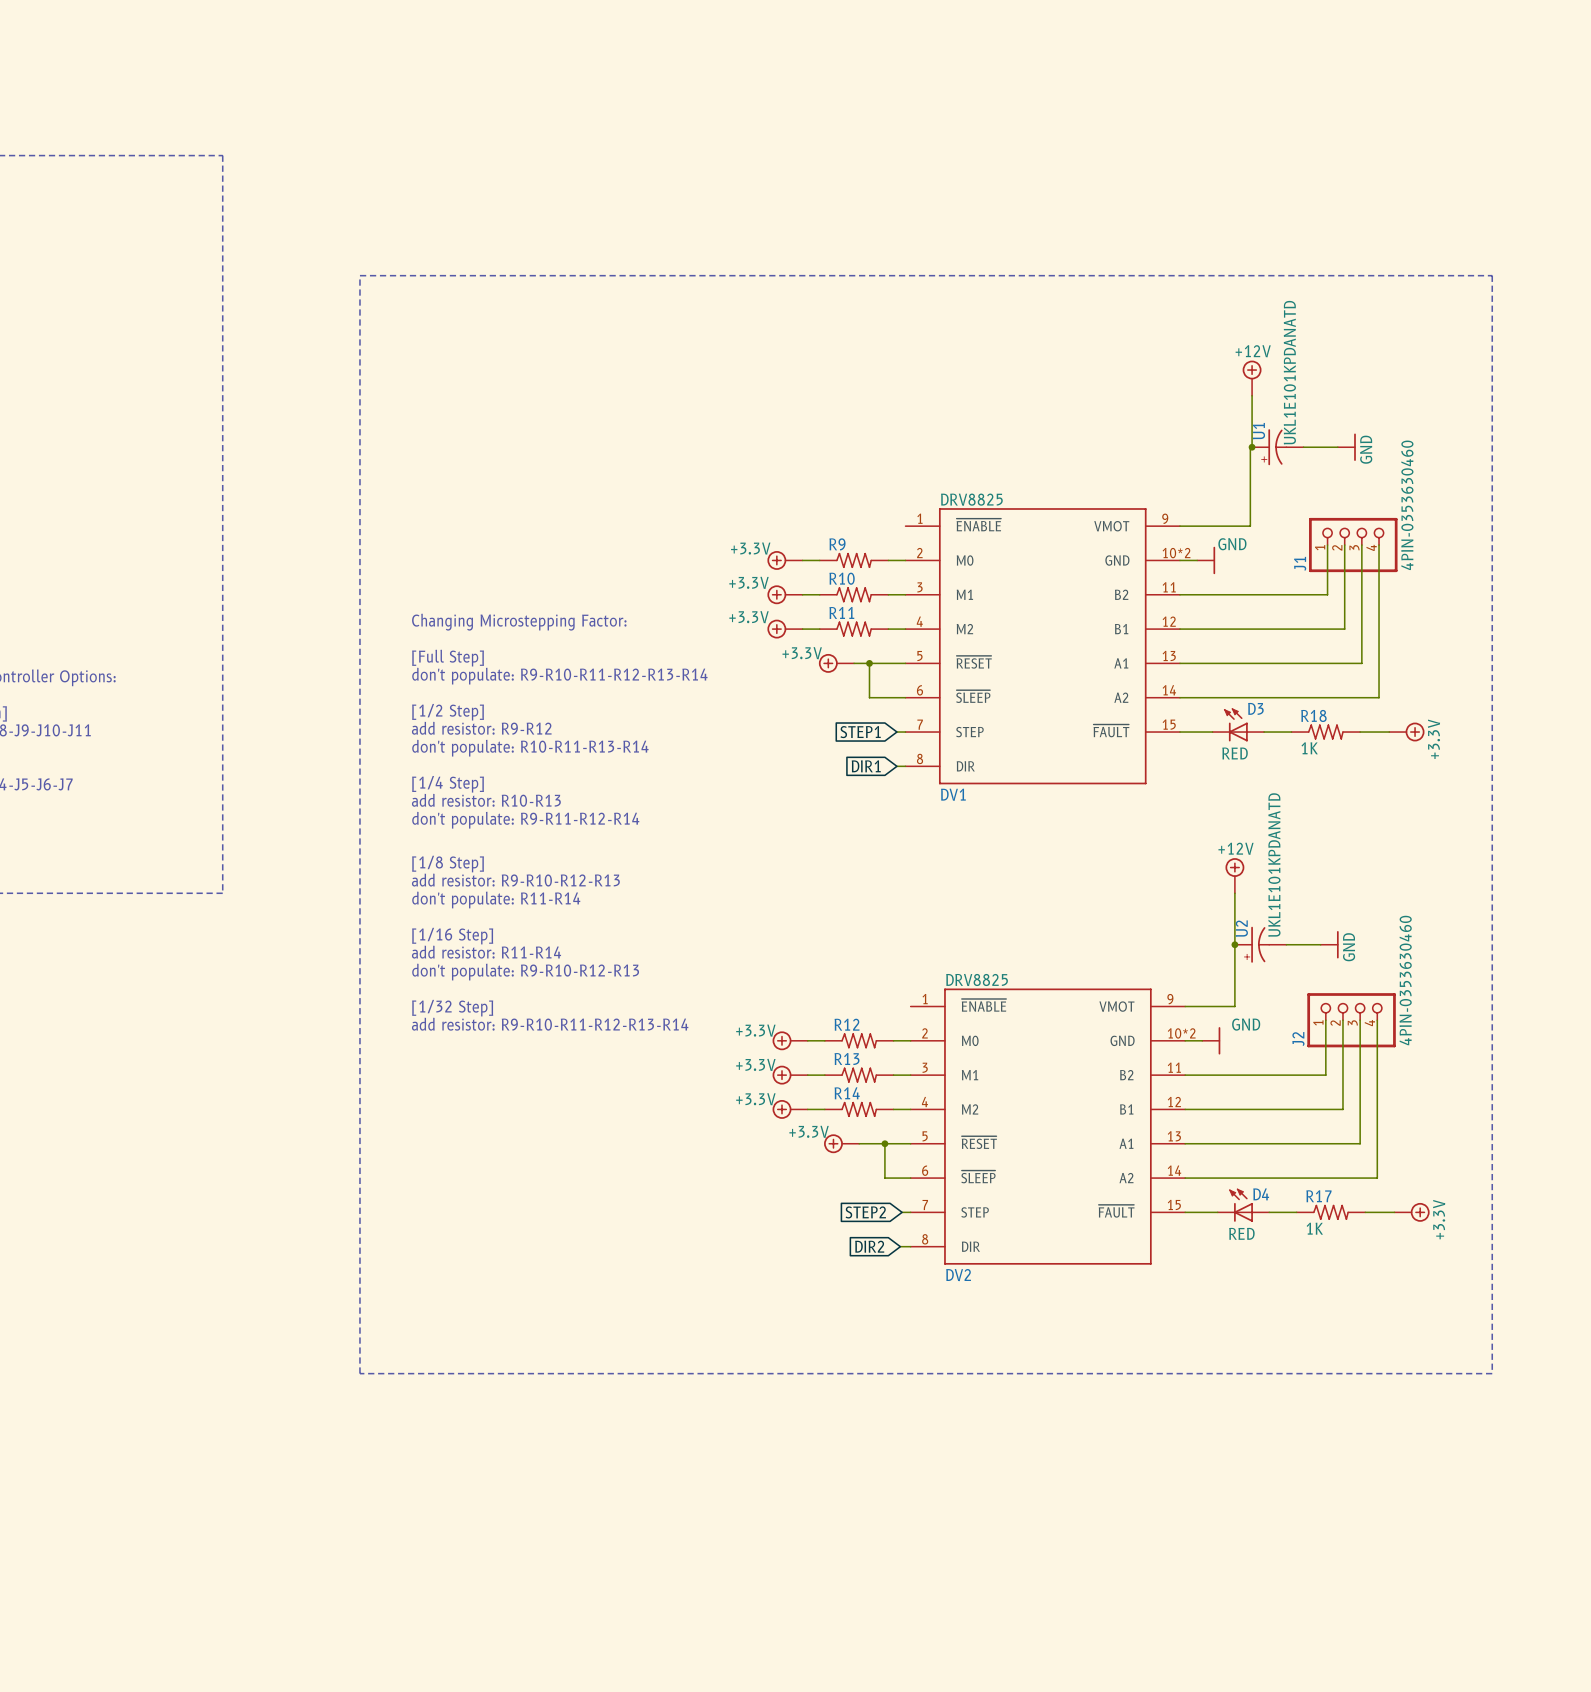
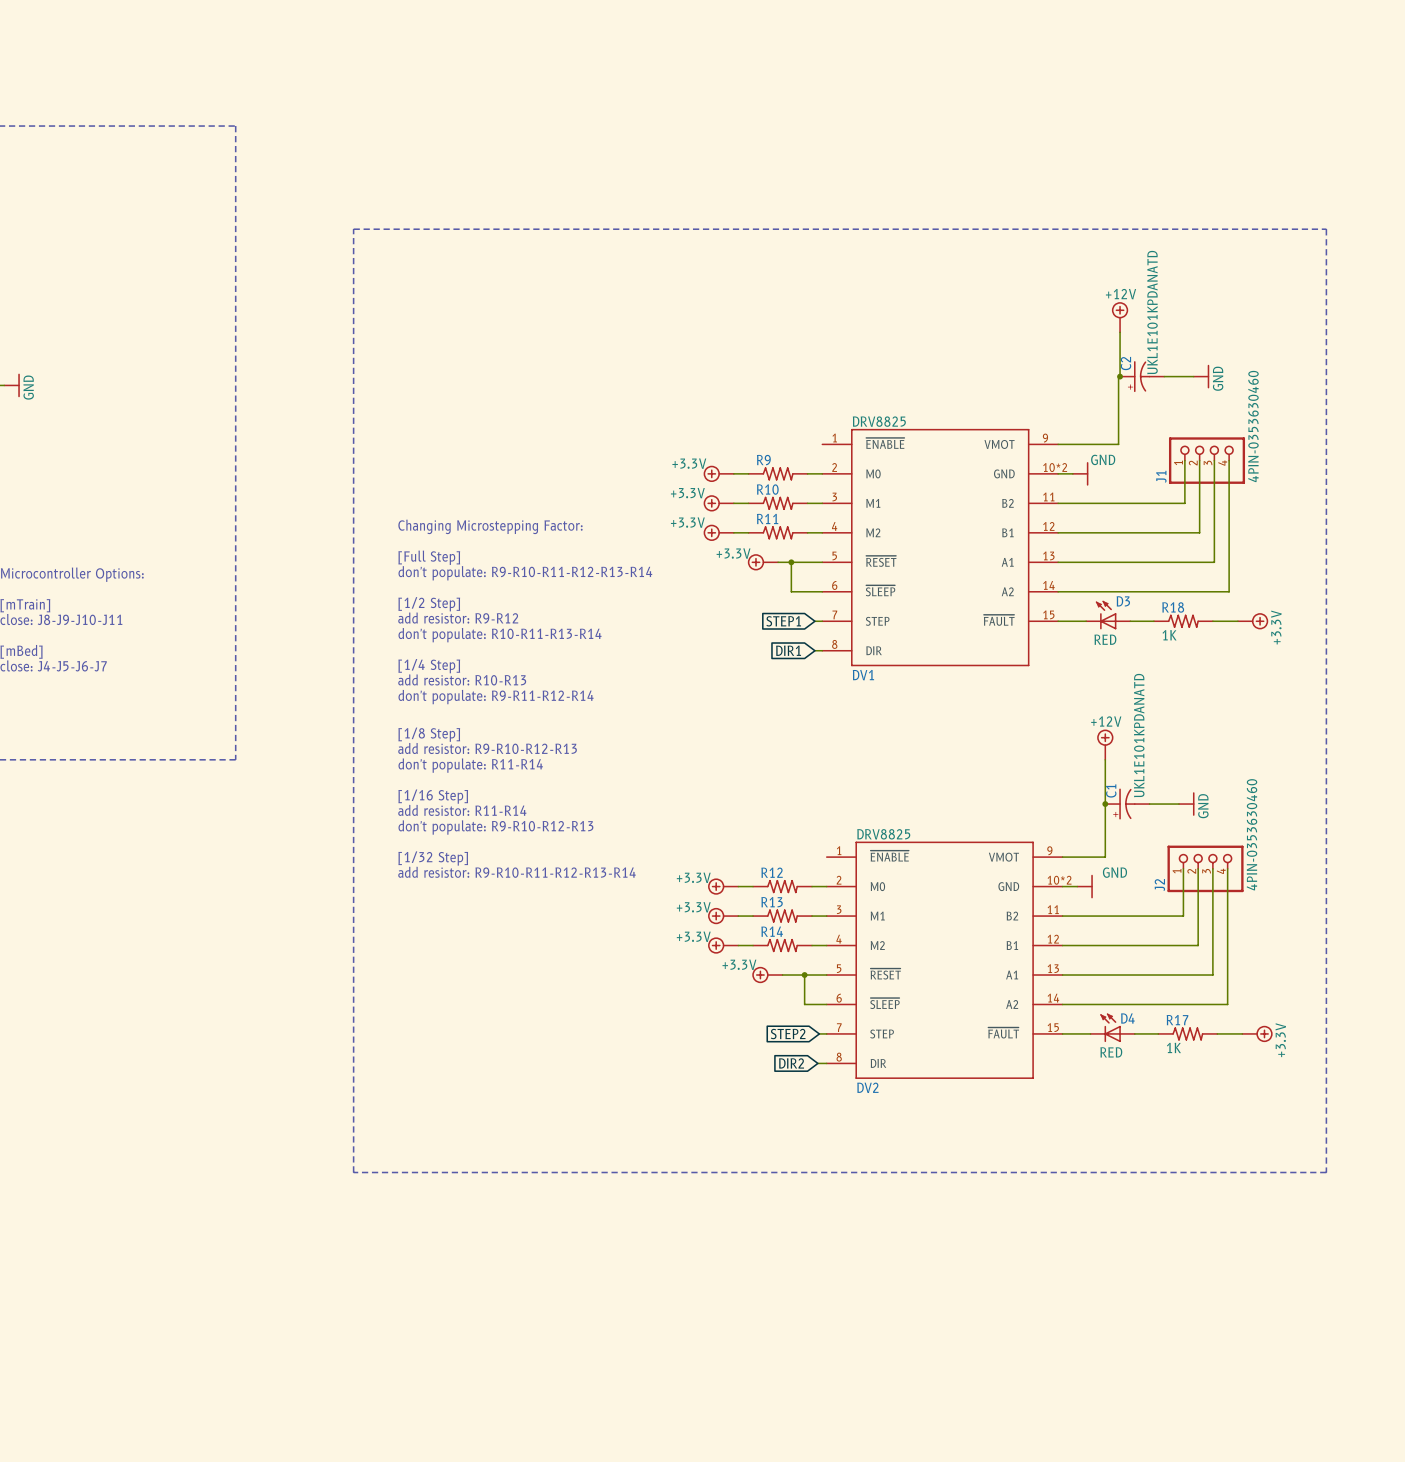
U1 name: U1 (1258, 431) -> C2 (1126, 363)
U2 name: U2 (1241, 928) -> C1 (1111, 790)

